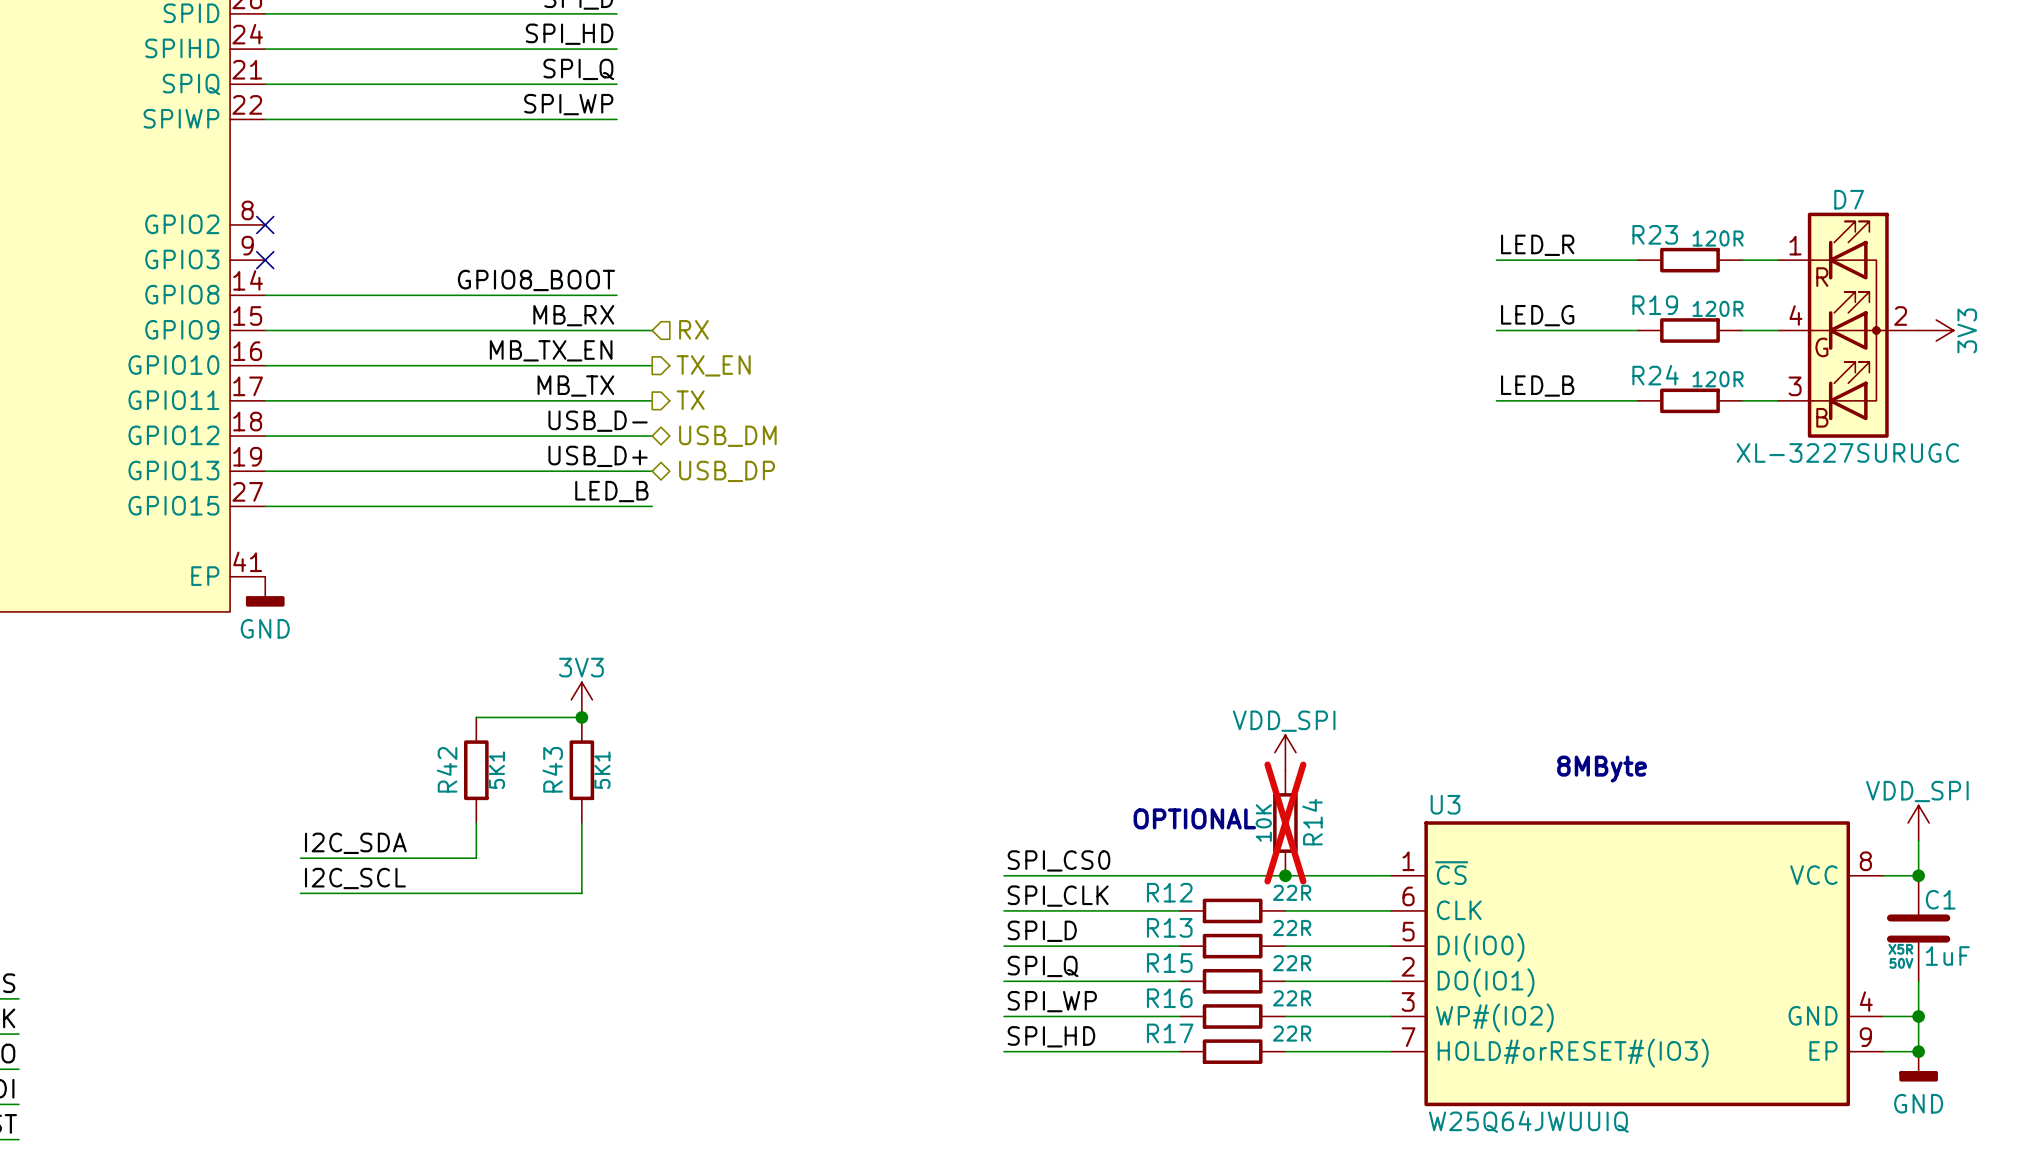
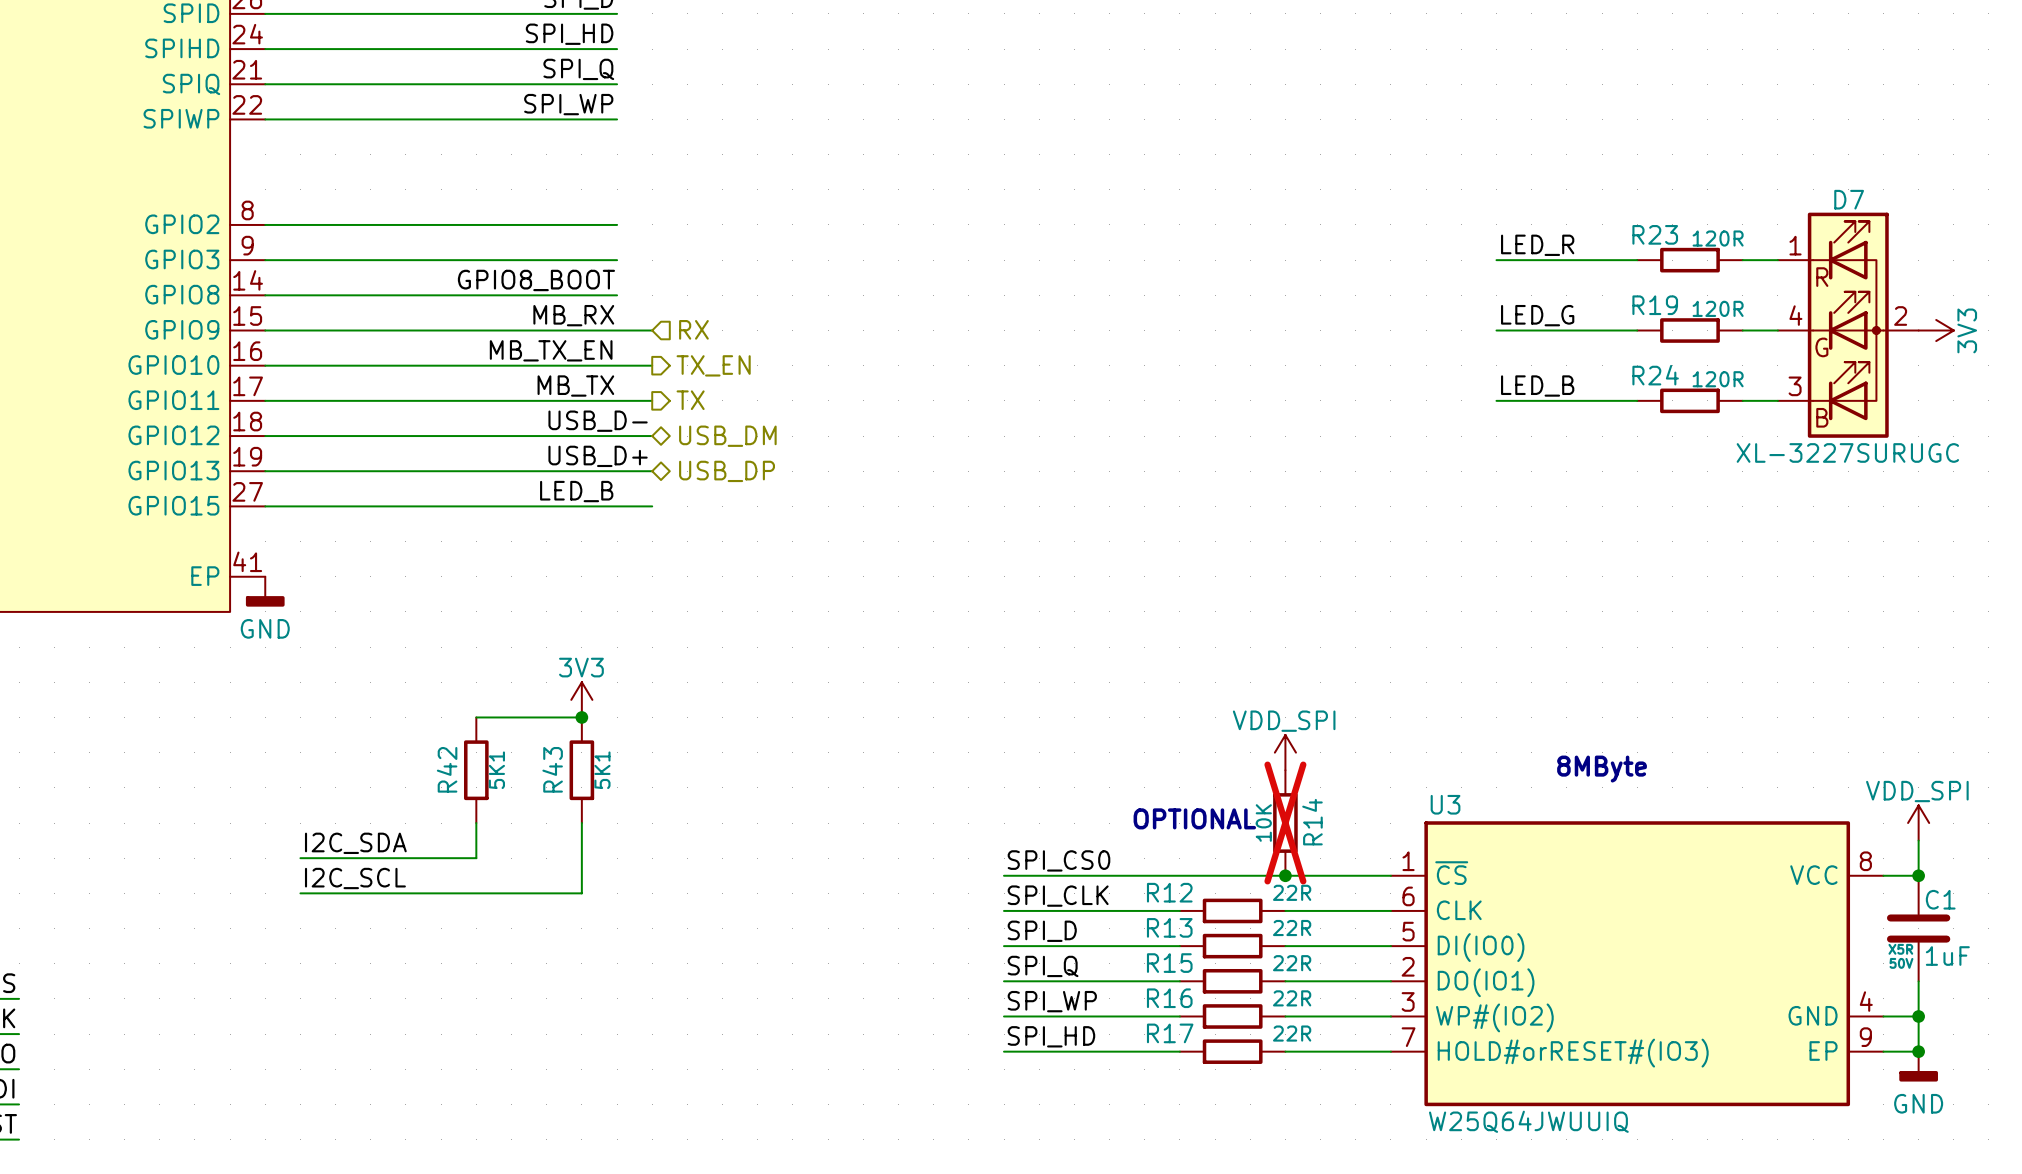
wire: none -> (265, 224) (617, 224)
no-connect mark: (265, 224) -> none
wire: none -> (265, 260) (617, 260)
no-connect mark: (265, 260) -> none
label position: LED_B (611, 491) -> LED_B (576, 491)

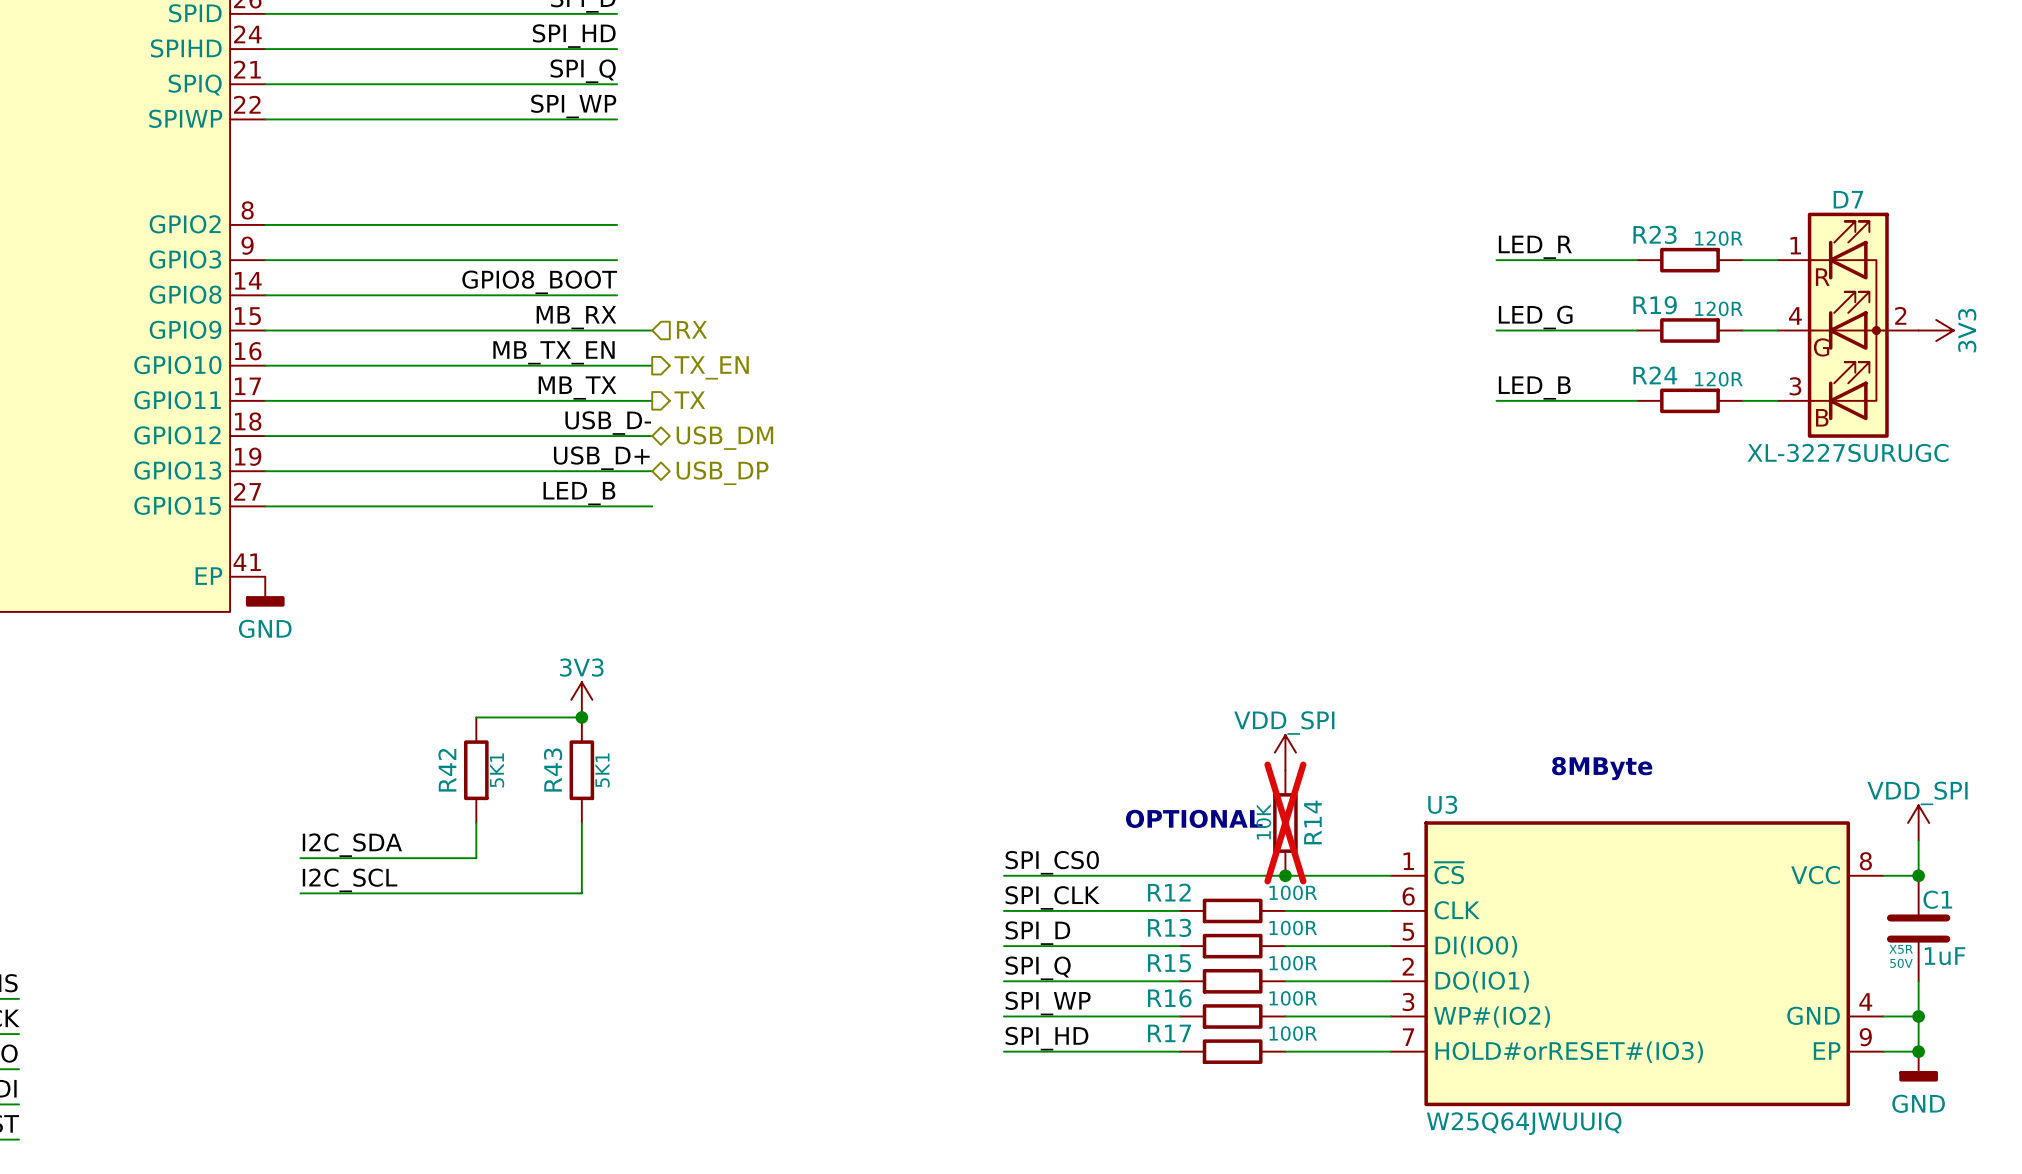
R12 value: 22R (1292, 892) -> 100R (1293, 892)
R13 value: 22R (1292, 928) -> 100R (1293, 928)
R15 value: 22R (1292, 963) -> 100R (1293, 963)
R16 value: 22R (1292, 998) -> 100R (1293, 998)
R17 value: 22R (1292, 1033) -> 100R (1293, 1033)

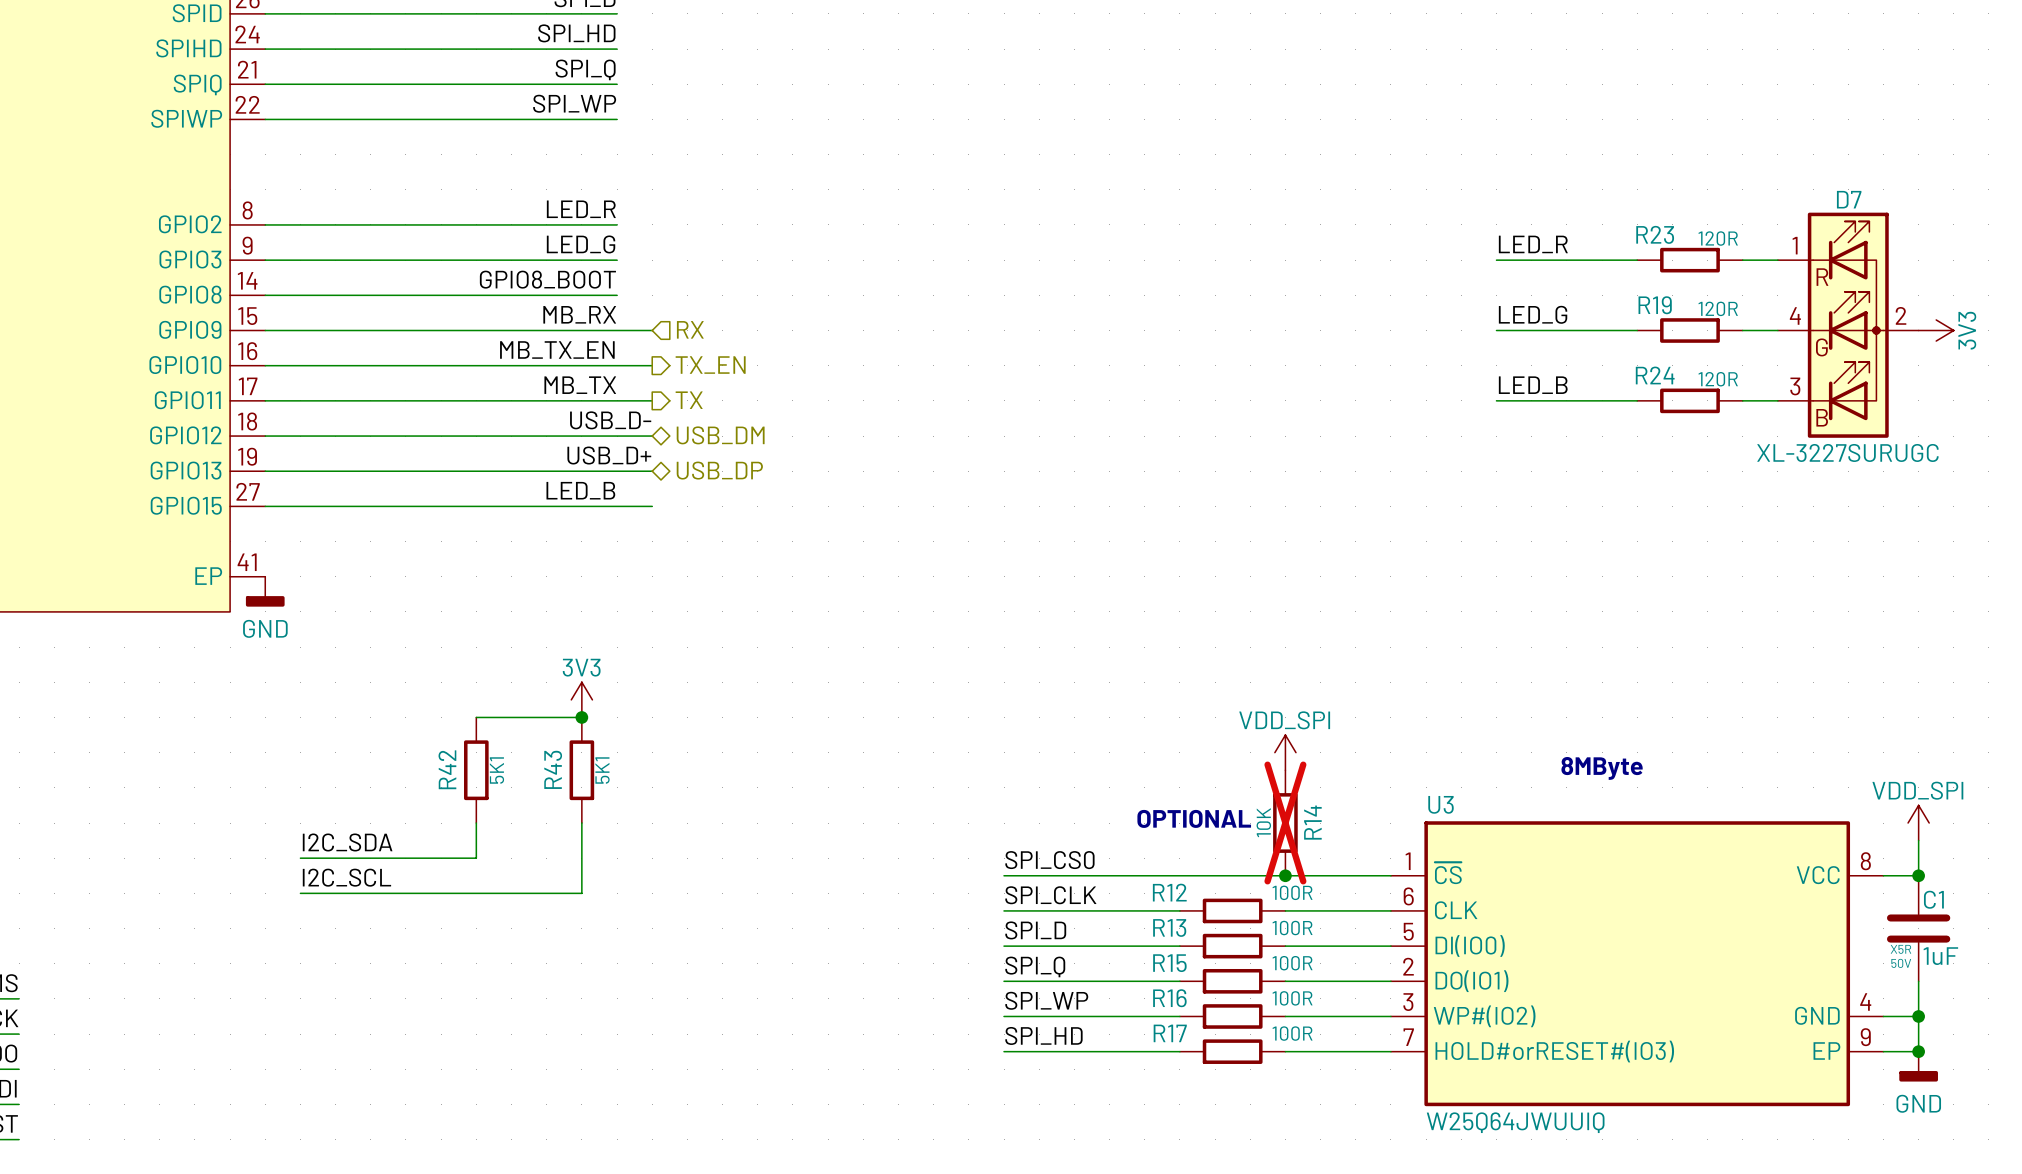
label: none -> LED_R (581, 209)
label: none -> LED_G (581, 244)

